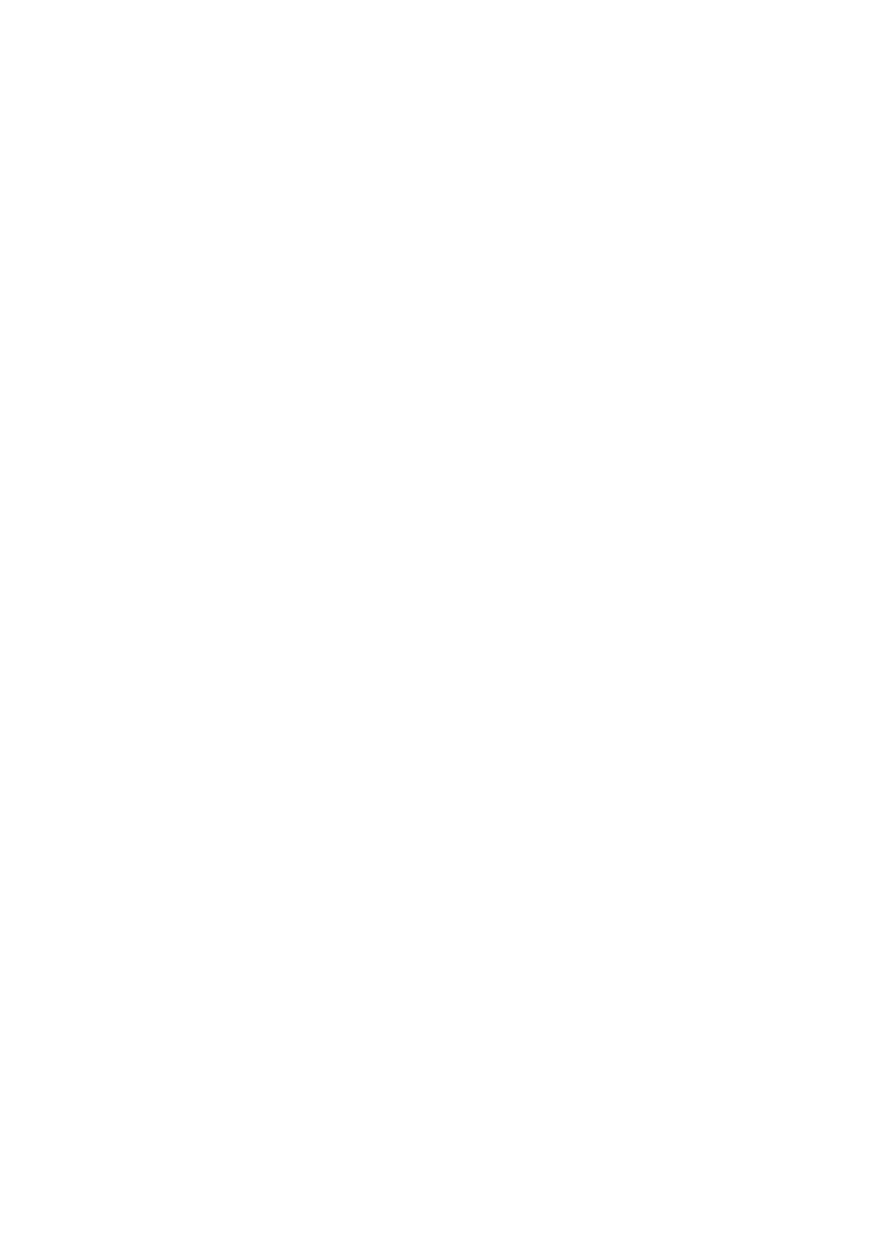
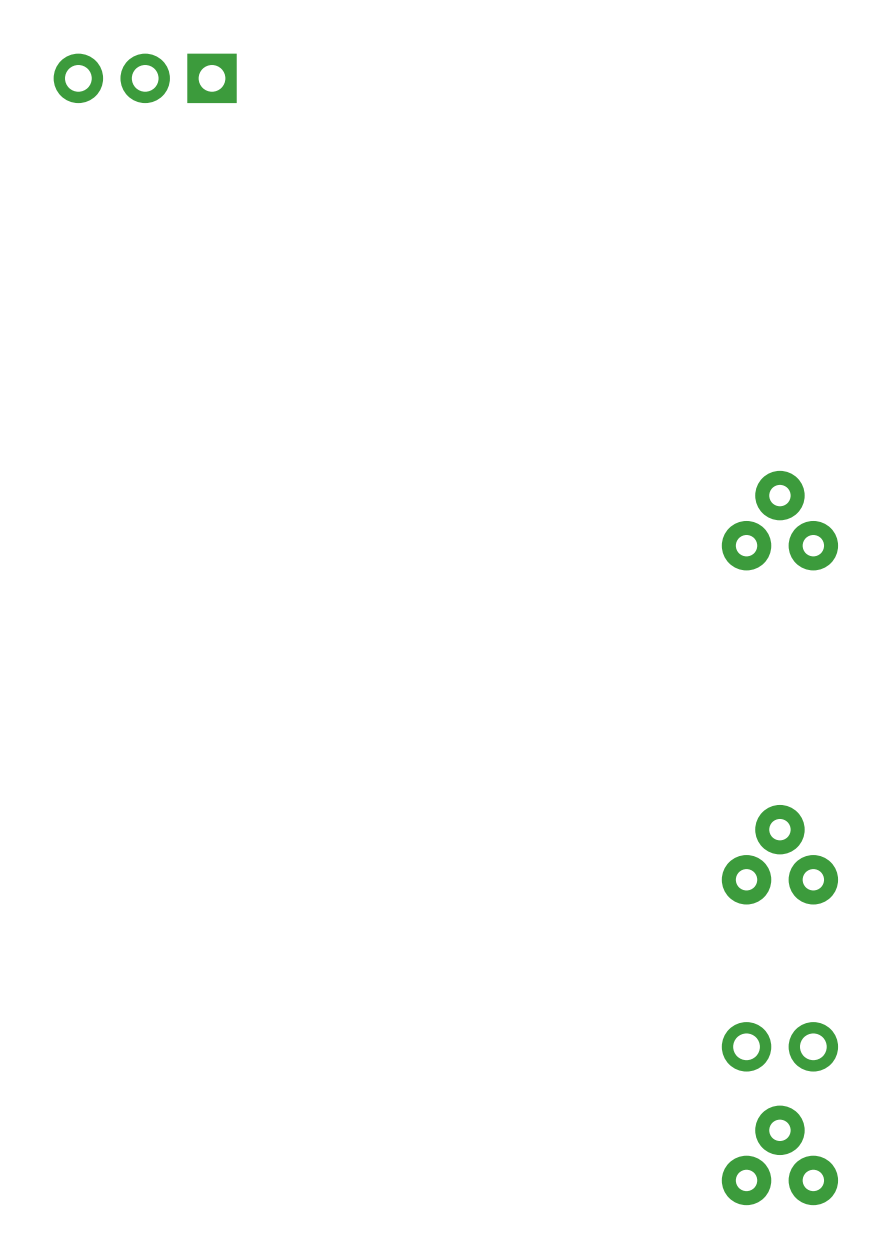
part: none -> (145, 78)
part: none -> (779, 520)
part: none -> (779, 854)
part: none -> (779, 1046)
part: none -> (779, 1155)

